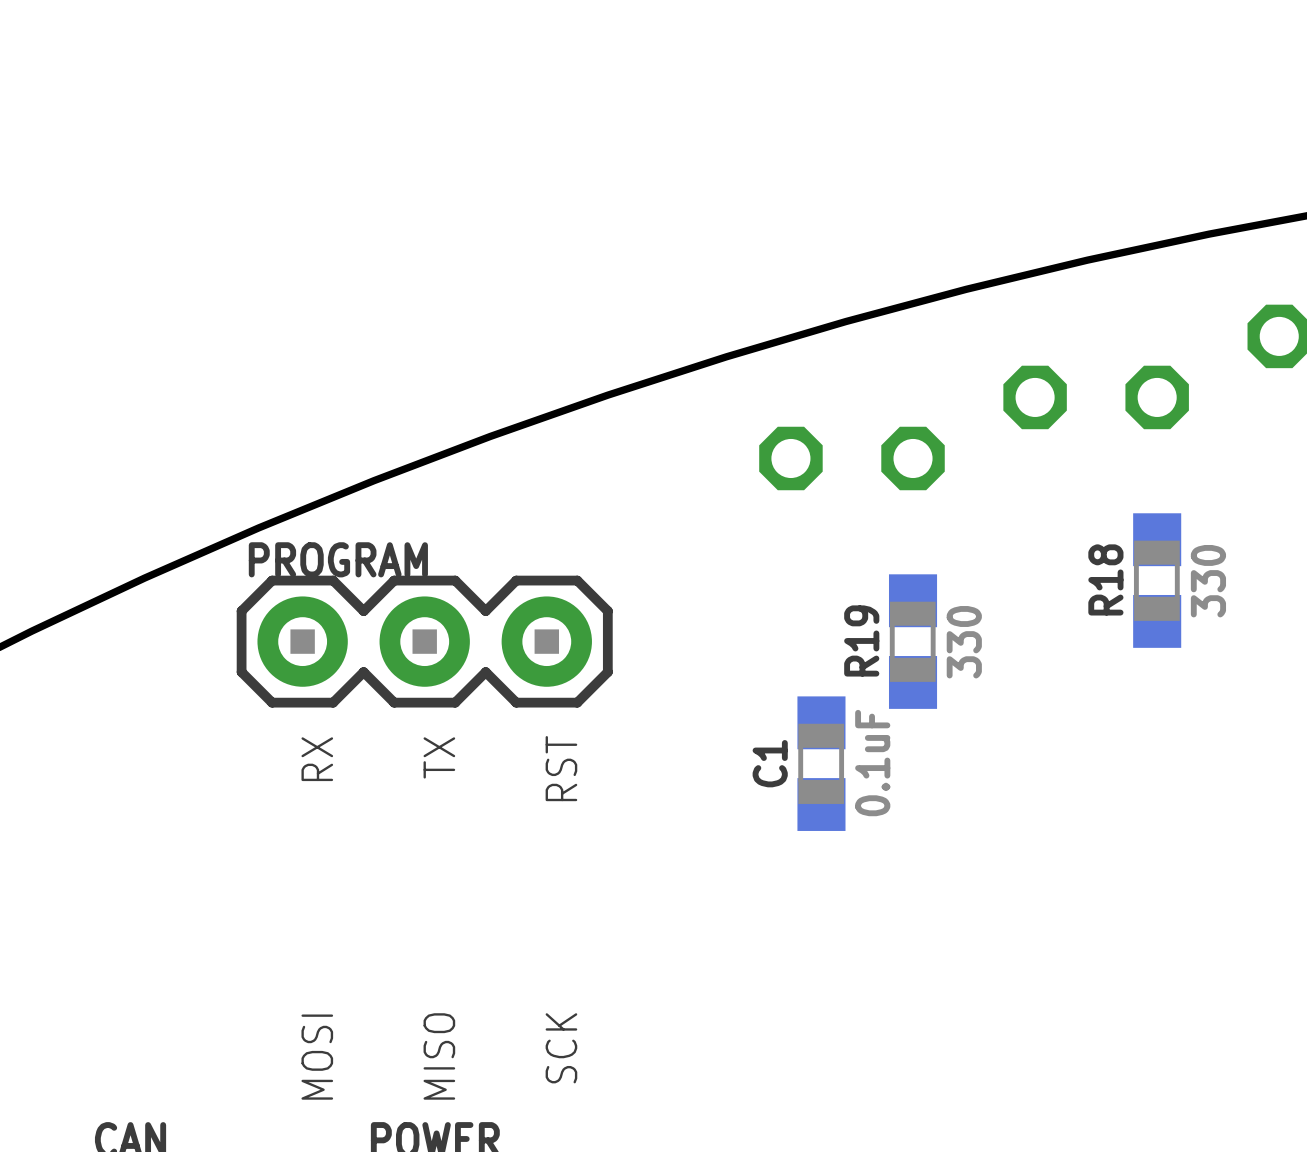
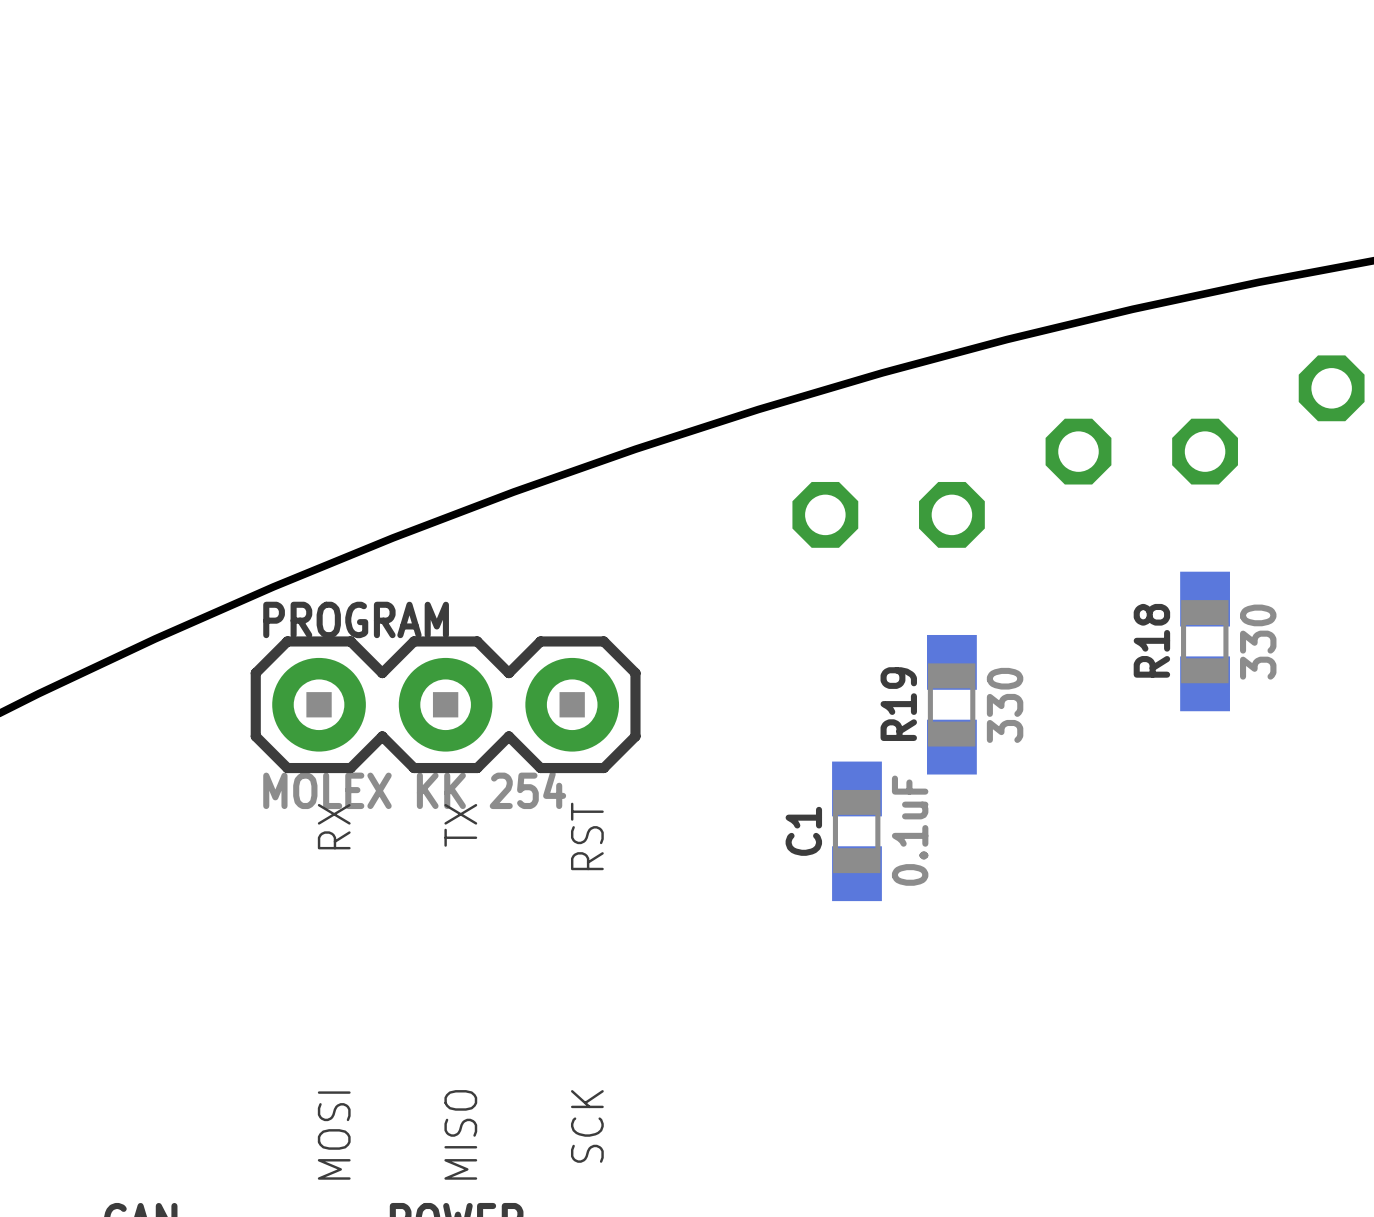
PROGRAM value: none -> MOLEX KK 254 (414, 790)

